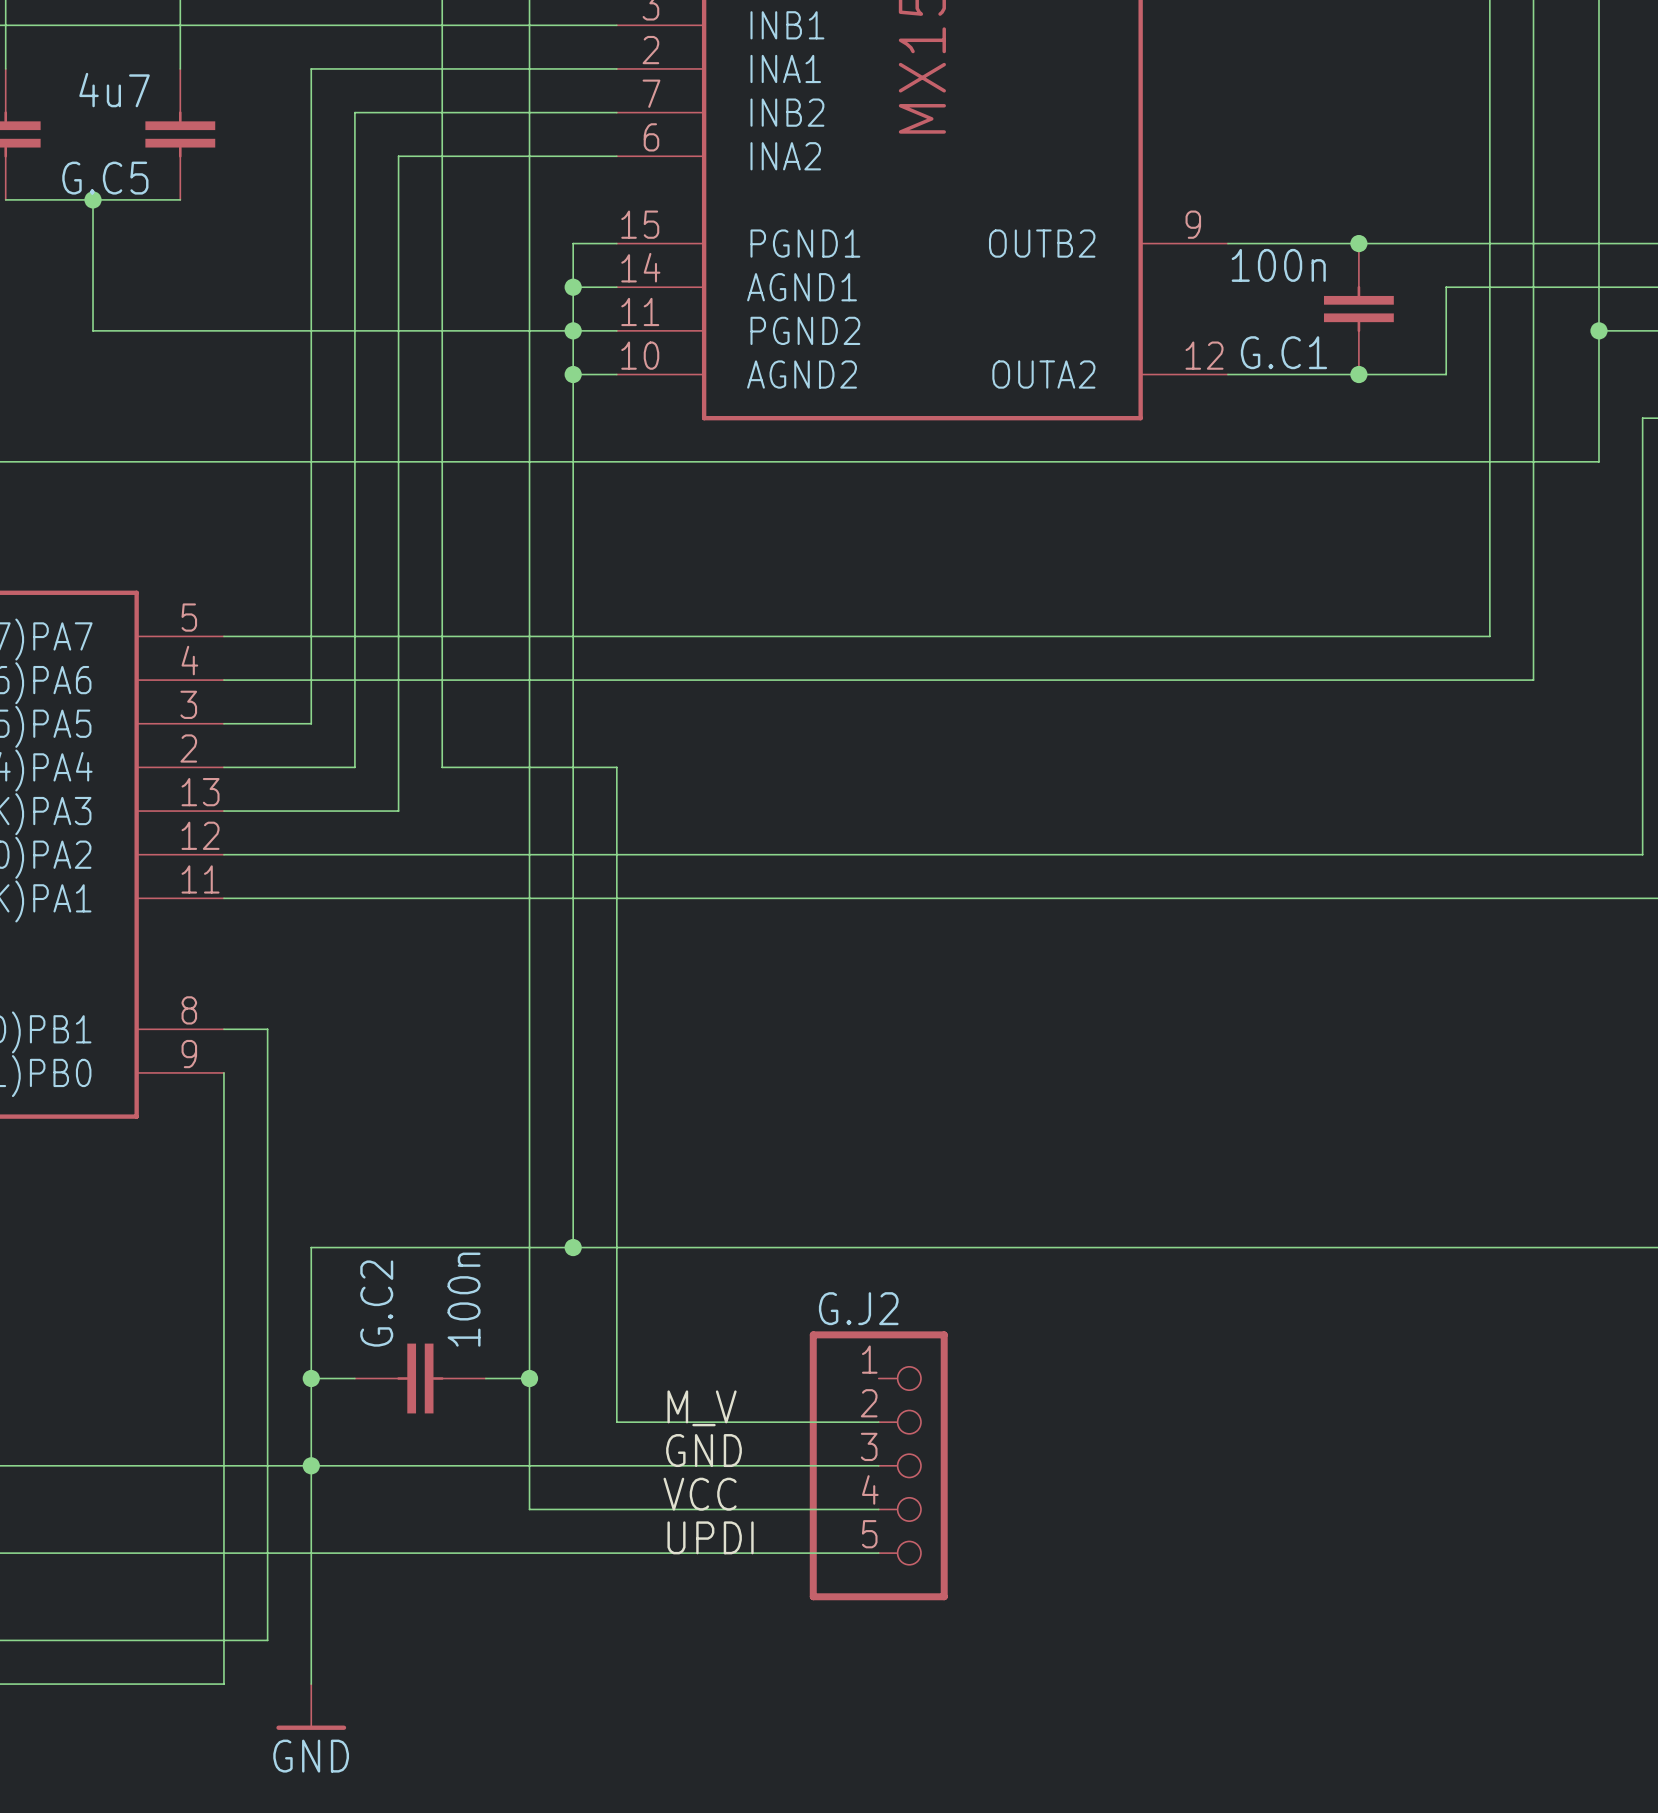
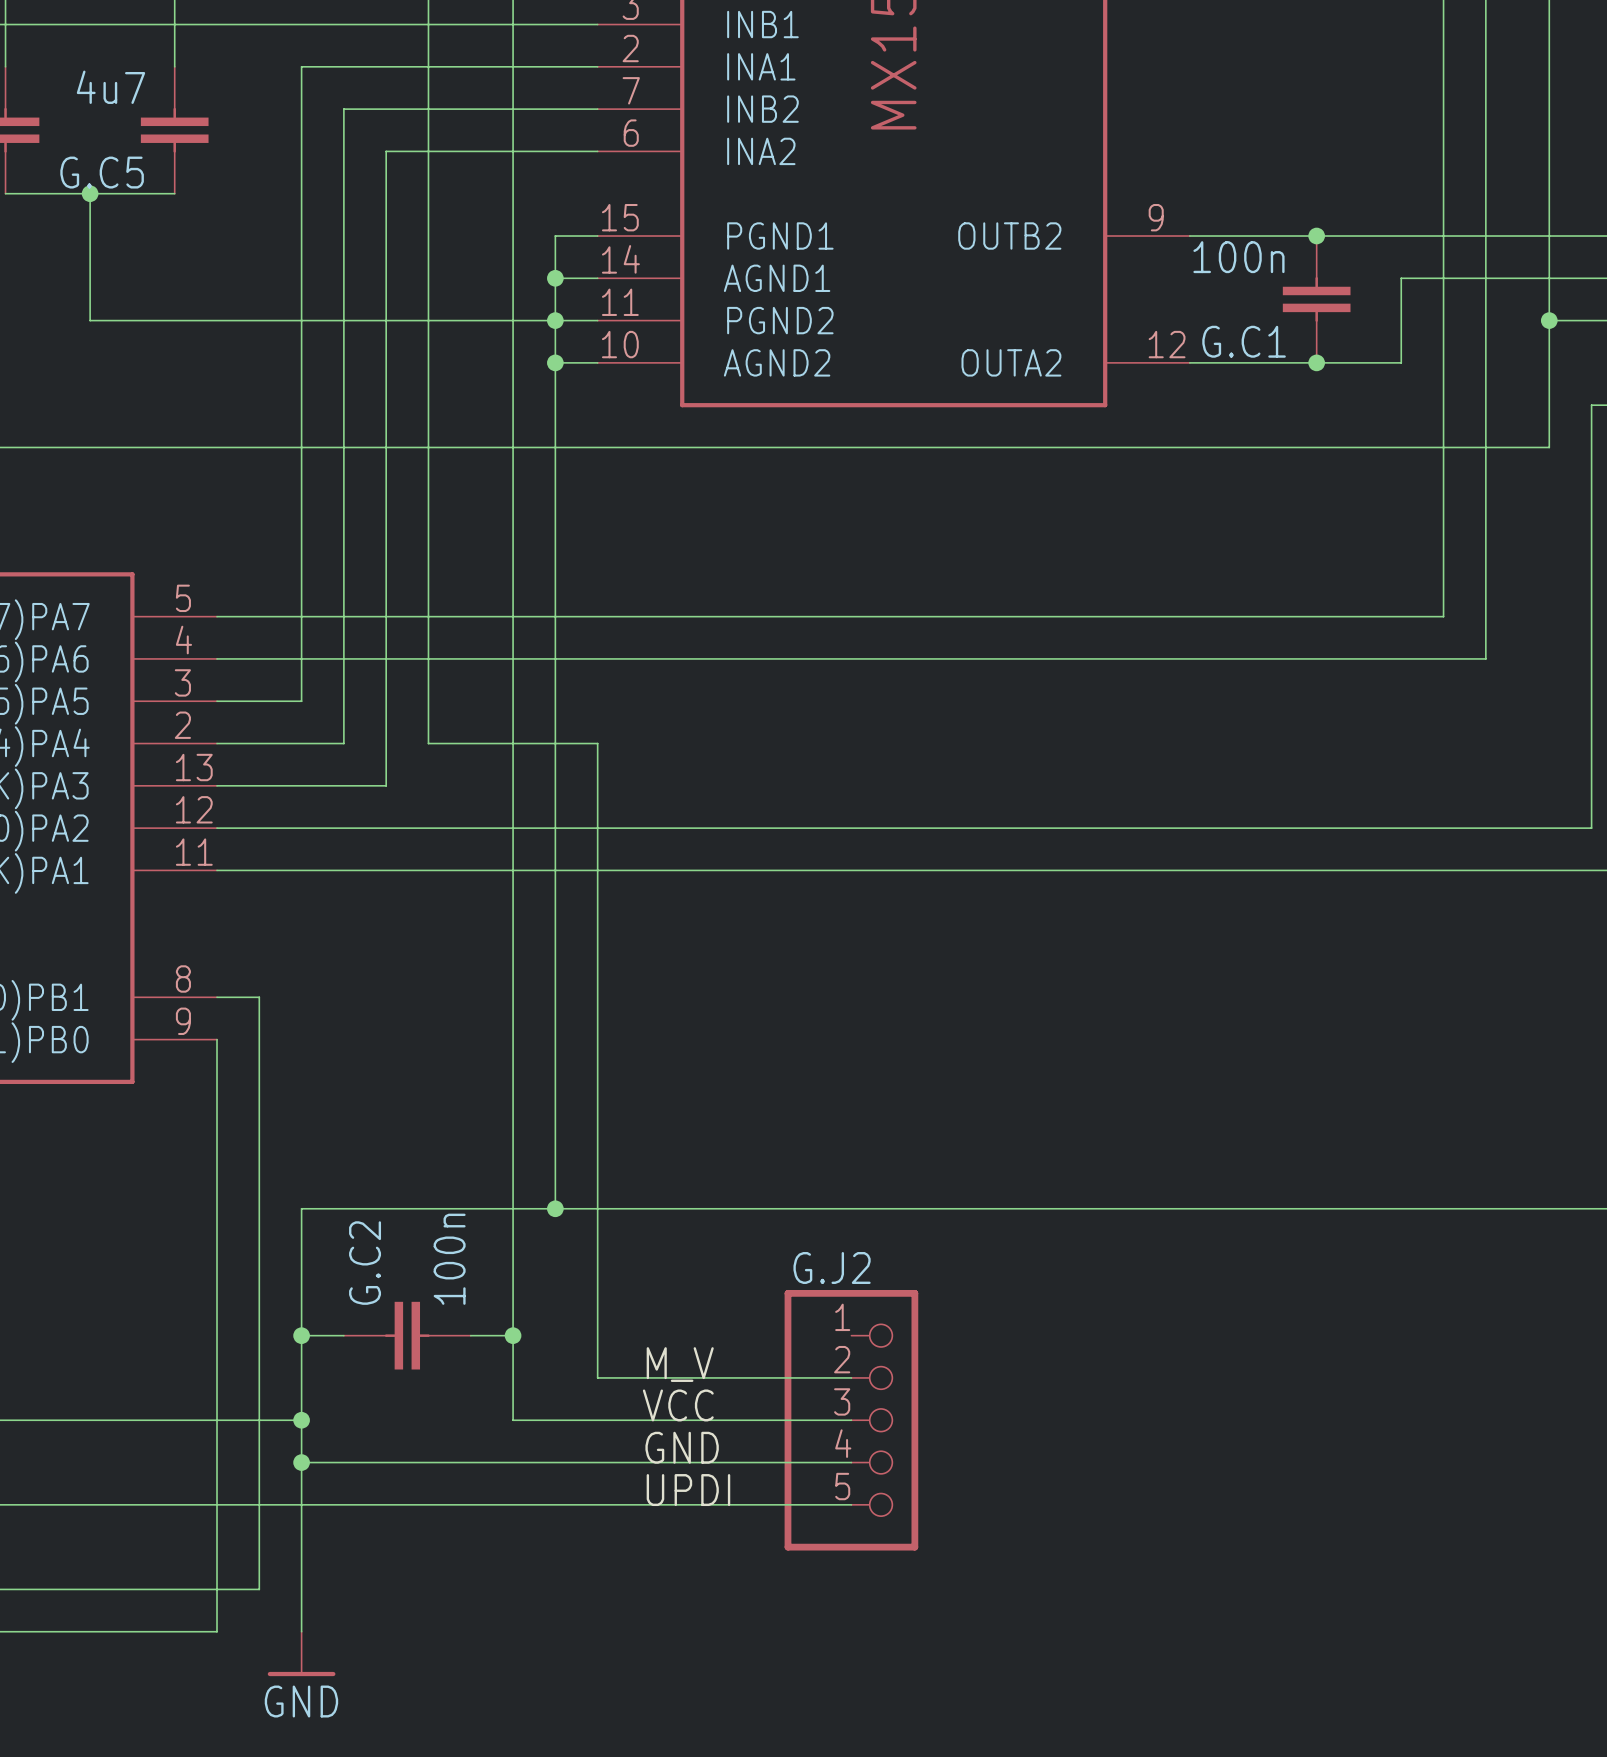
label: GND (703, 1450) -> VCC (678, 1405)
wire: (311, 1465) (529, 1465) (529, 1509) -> (301, 1462) (513, 1462)
label: VCC (700, 1494) -> GND (682, 1447)
junction: none -> (301, 1462)

